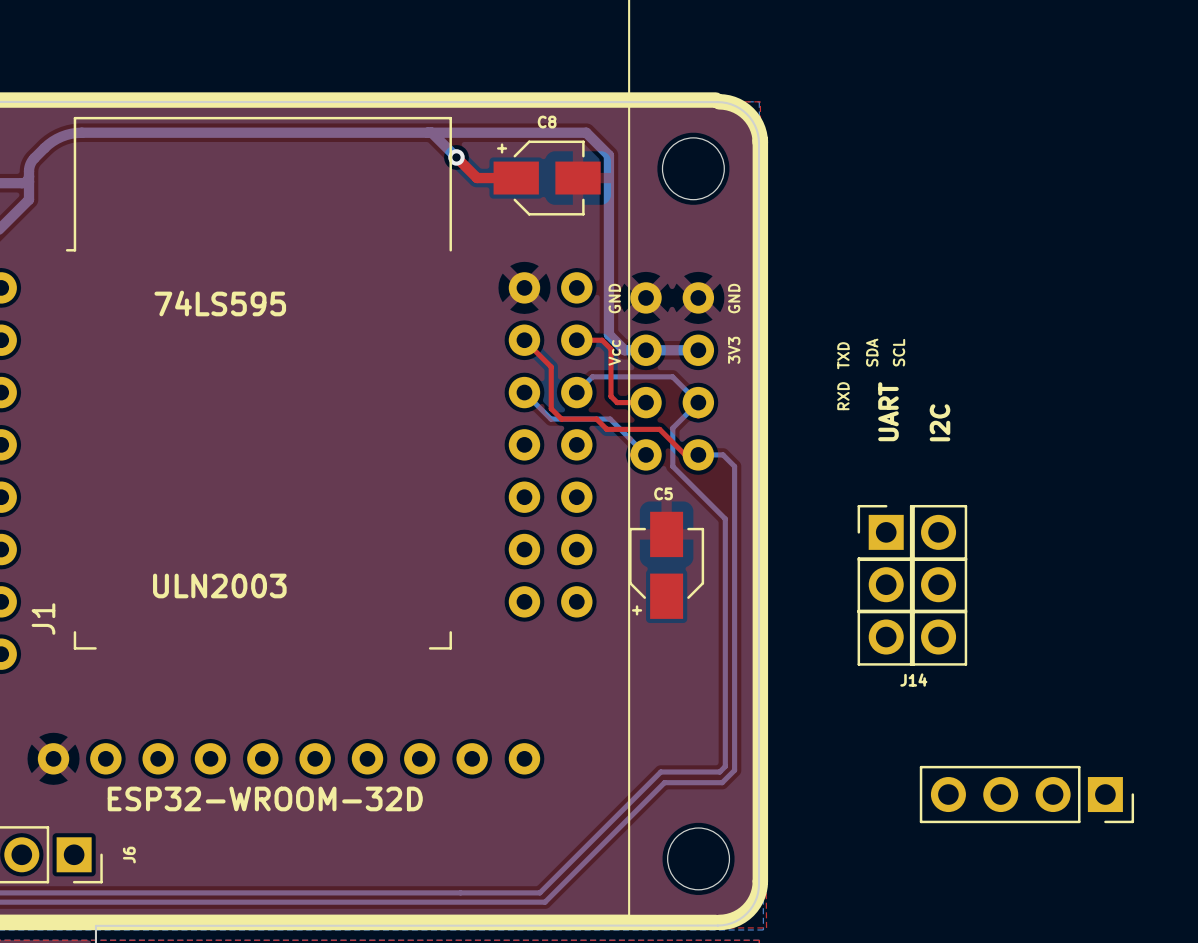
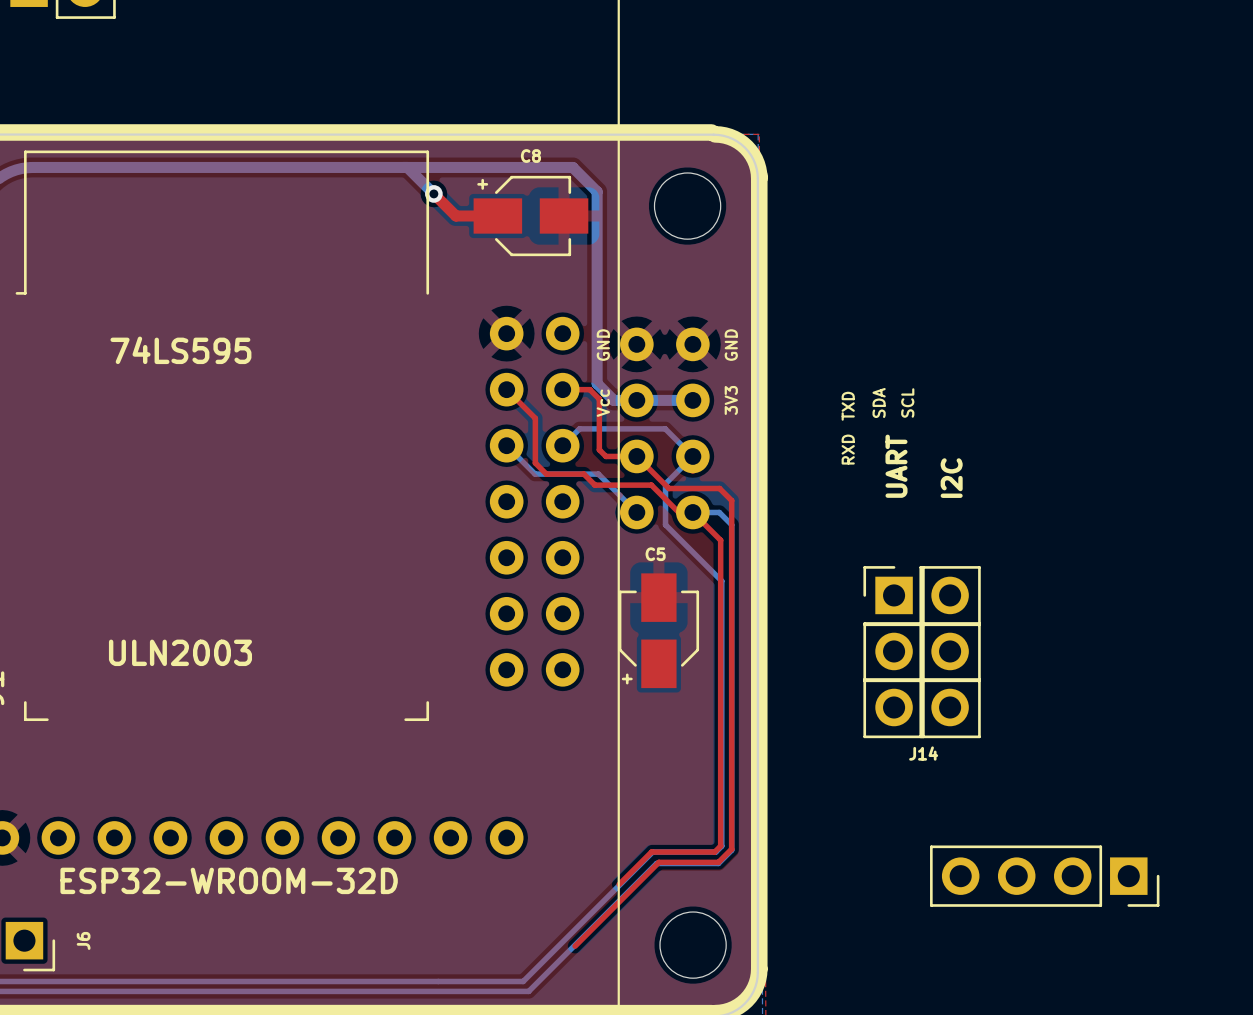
top track: none -> (636, 456) (668, 488) (719, 488) (731, 500) (731, 849) (718, 862) (658, 862) (575, 946)
top track: none -> (692, 512) (720, 540) (720, 846) (714, 852) (651, 852) (619, 884)

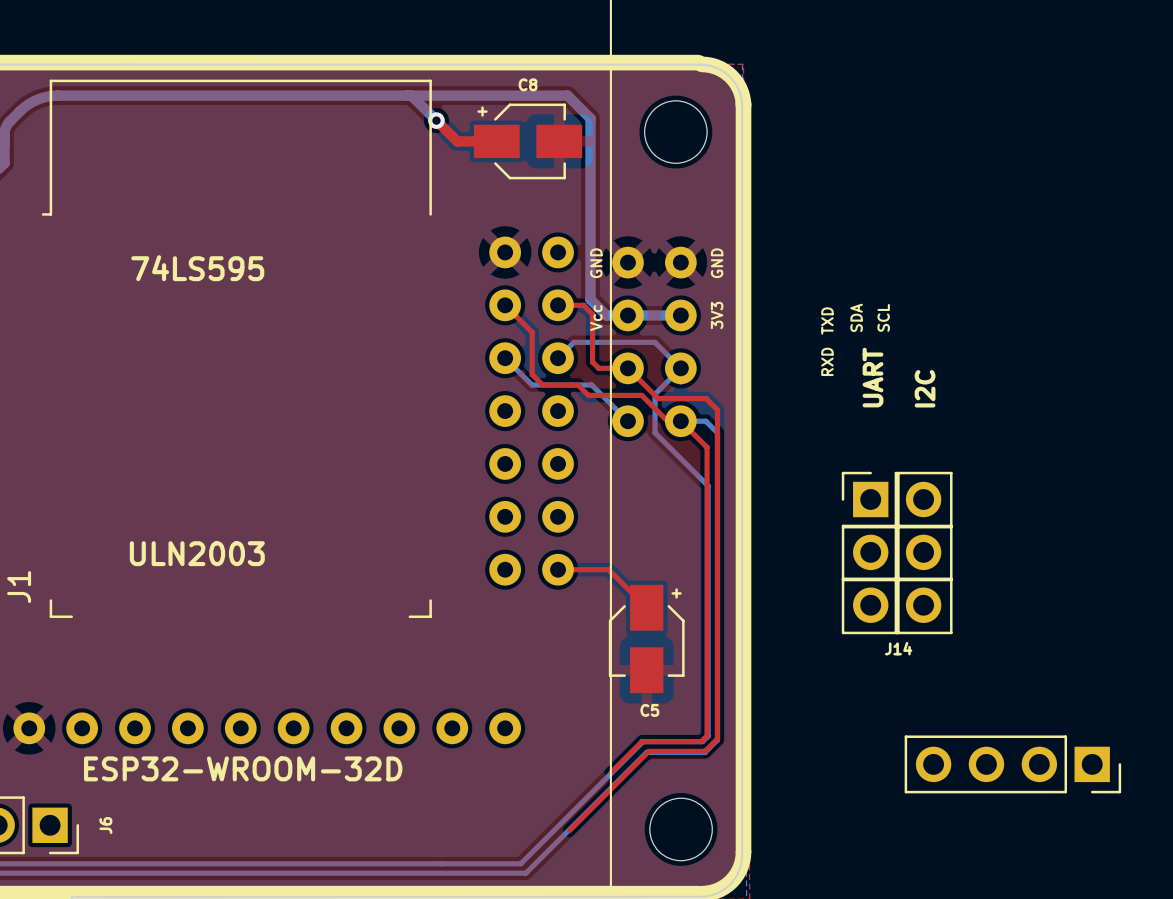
C5 rotation: 0° (658, 630) -> 180° (646, 638)
C5 position: (658, 630) -> (646, 638)
top track: none -> (558, 569) (608, 569) (646, 607)

